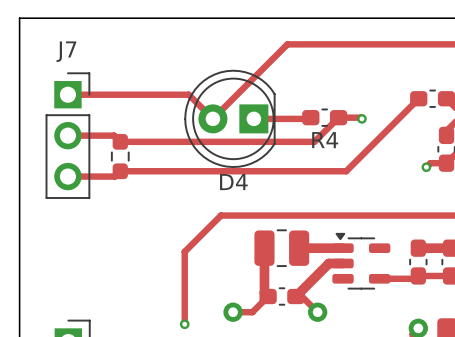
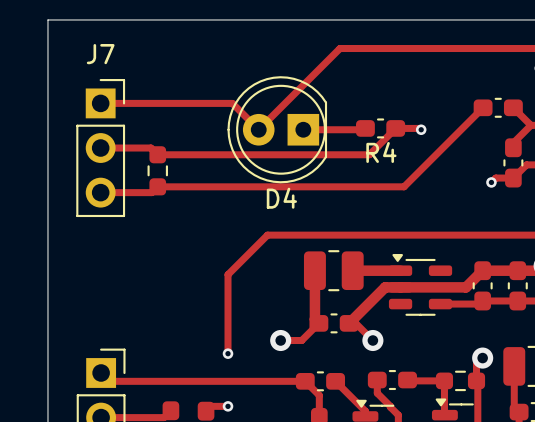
track: none -> (482, 270) (465, 287) (400, 287)

